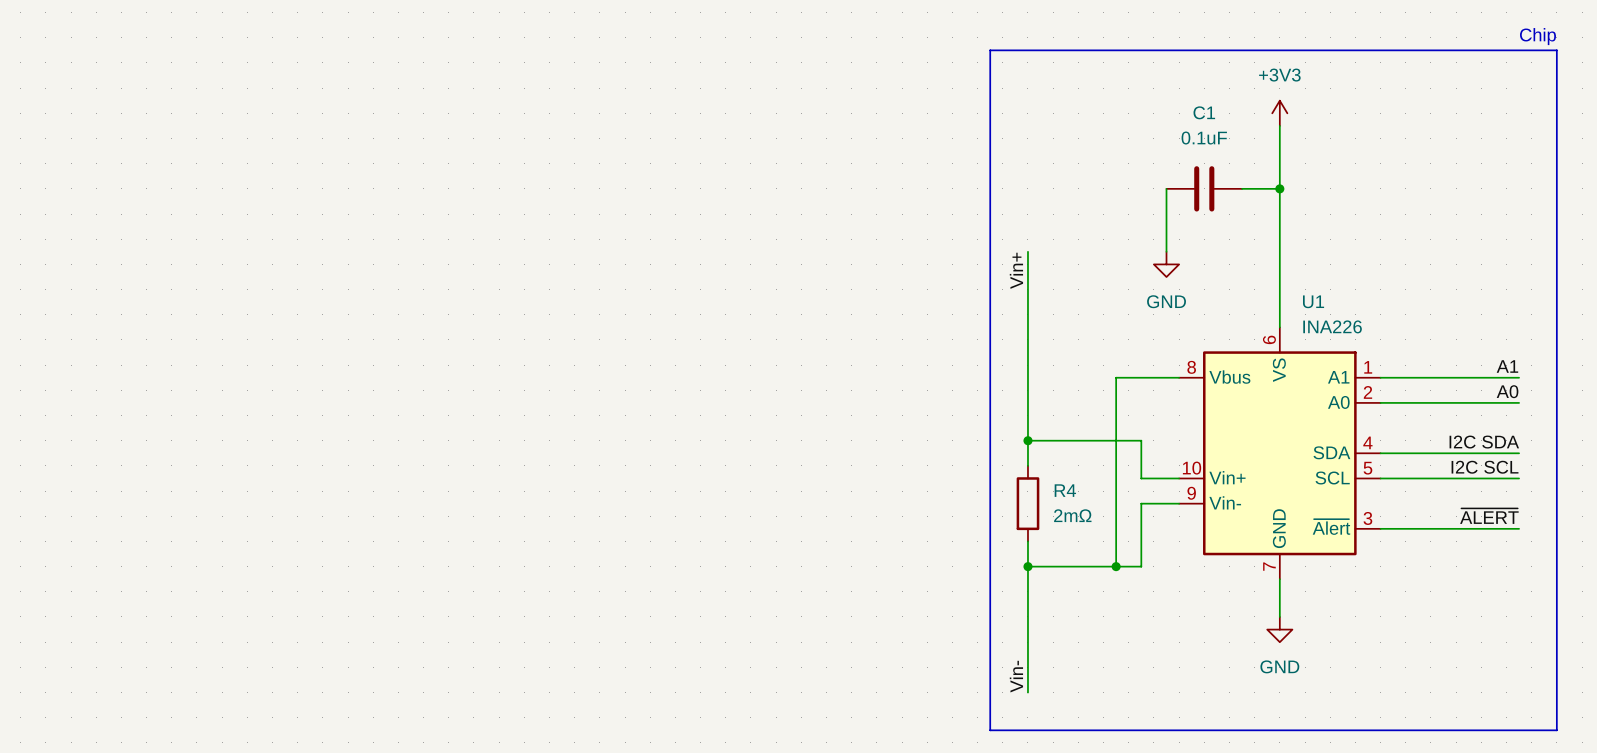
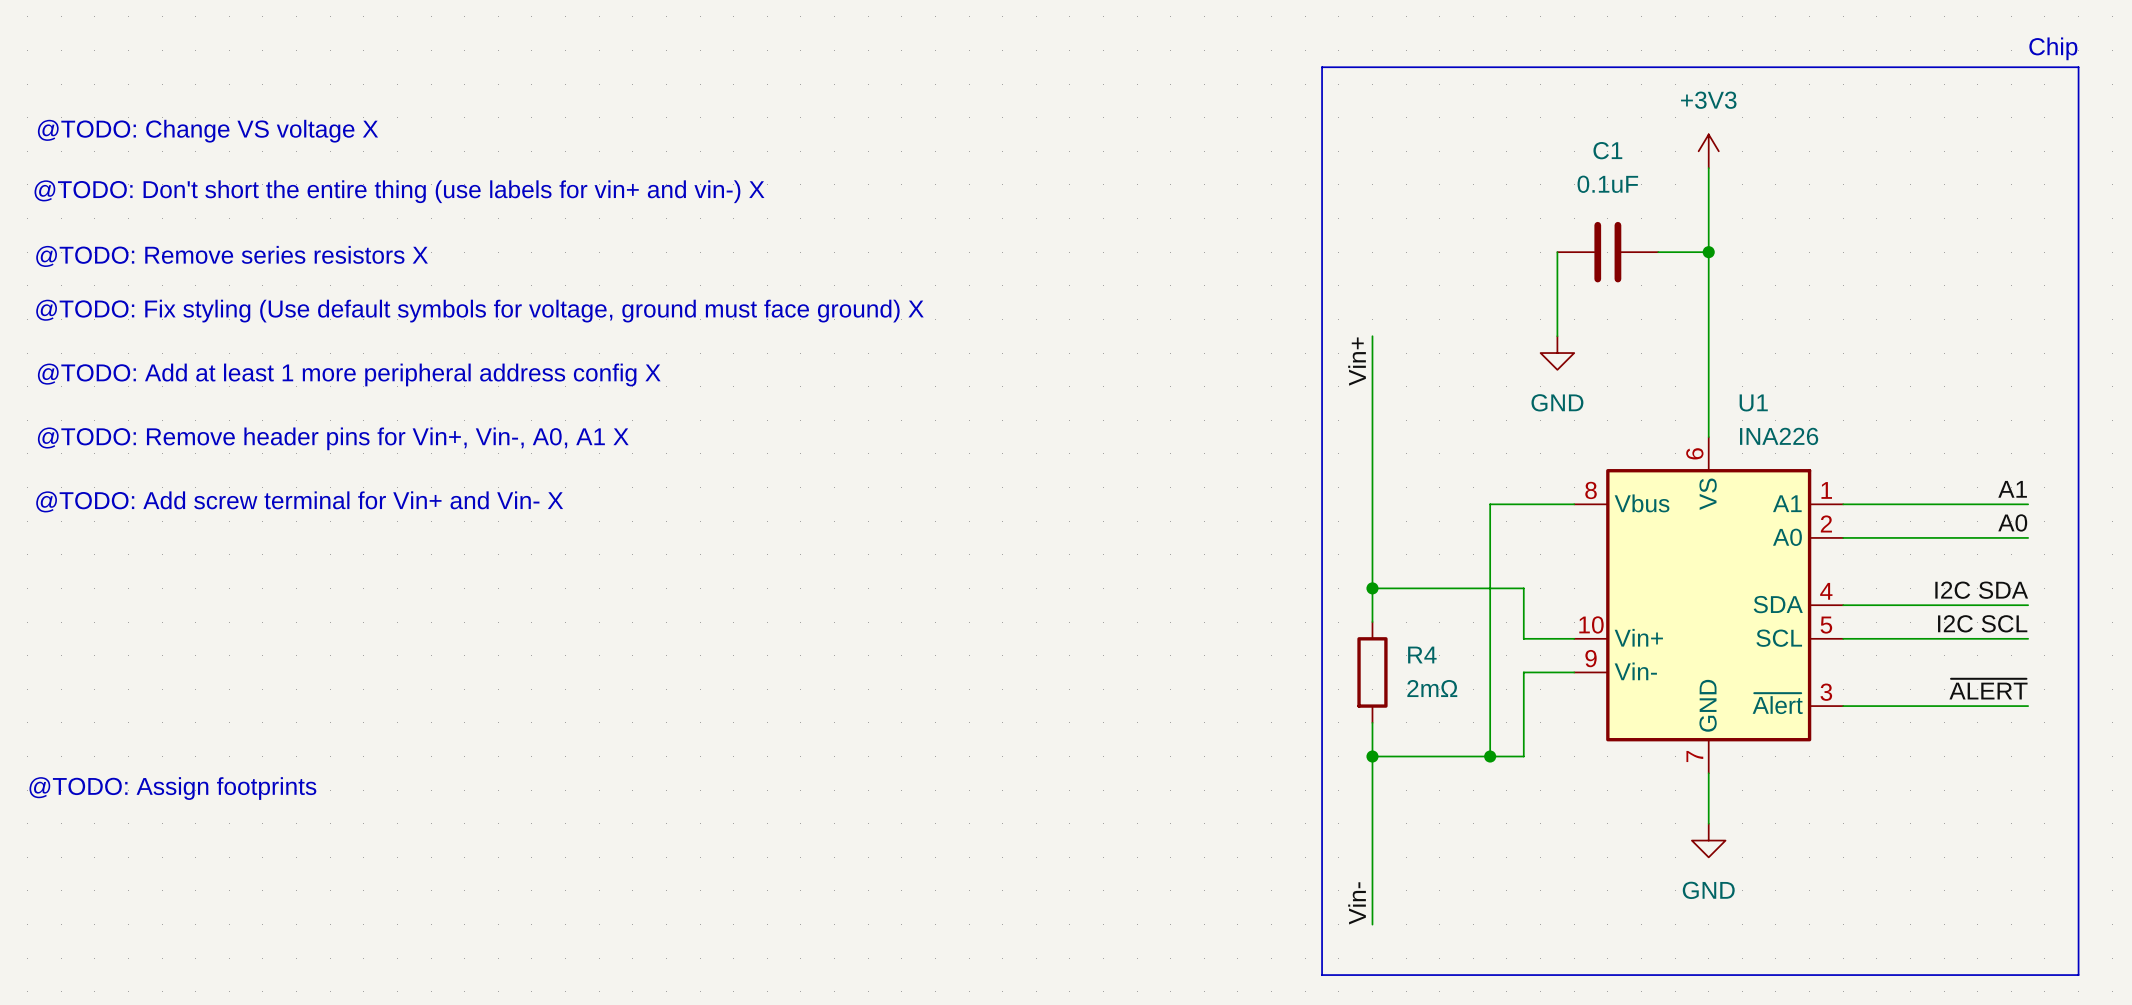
text: none -> @TODO: Change VS voltage X (207, 131)
text: none -> @TODO: Don't short the entire thing (use labels for vin+ and vin-) X (399, 191)
text: none -> @TODO: Remove series resistors X (232, 256)
text: none -> @TODO: Fix styling (Use default symbols for voltage, ground must face ground) X (479, 311)
text: none -> @TODO: Add at least 1 more peripheral address config X (349, 374)
text: none -> @TODO: Remove header pins for Vin+, Vin-, A0, A1 X (333, 438)
text: none -> @TODO: Add screw terminal for Vin+ and Vin- X (299, 501)
text: none -> @TODO: Assign footprints (172, 788)

